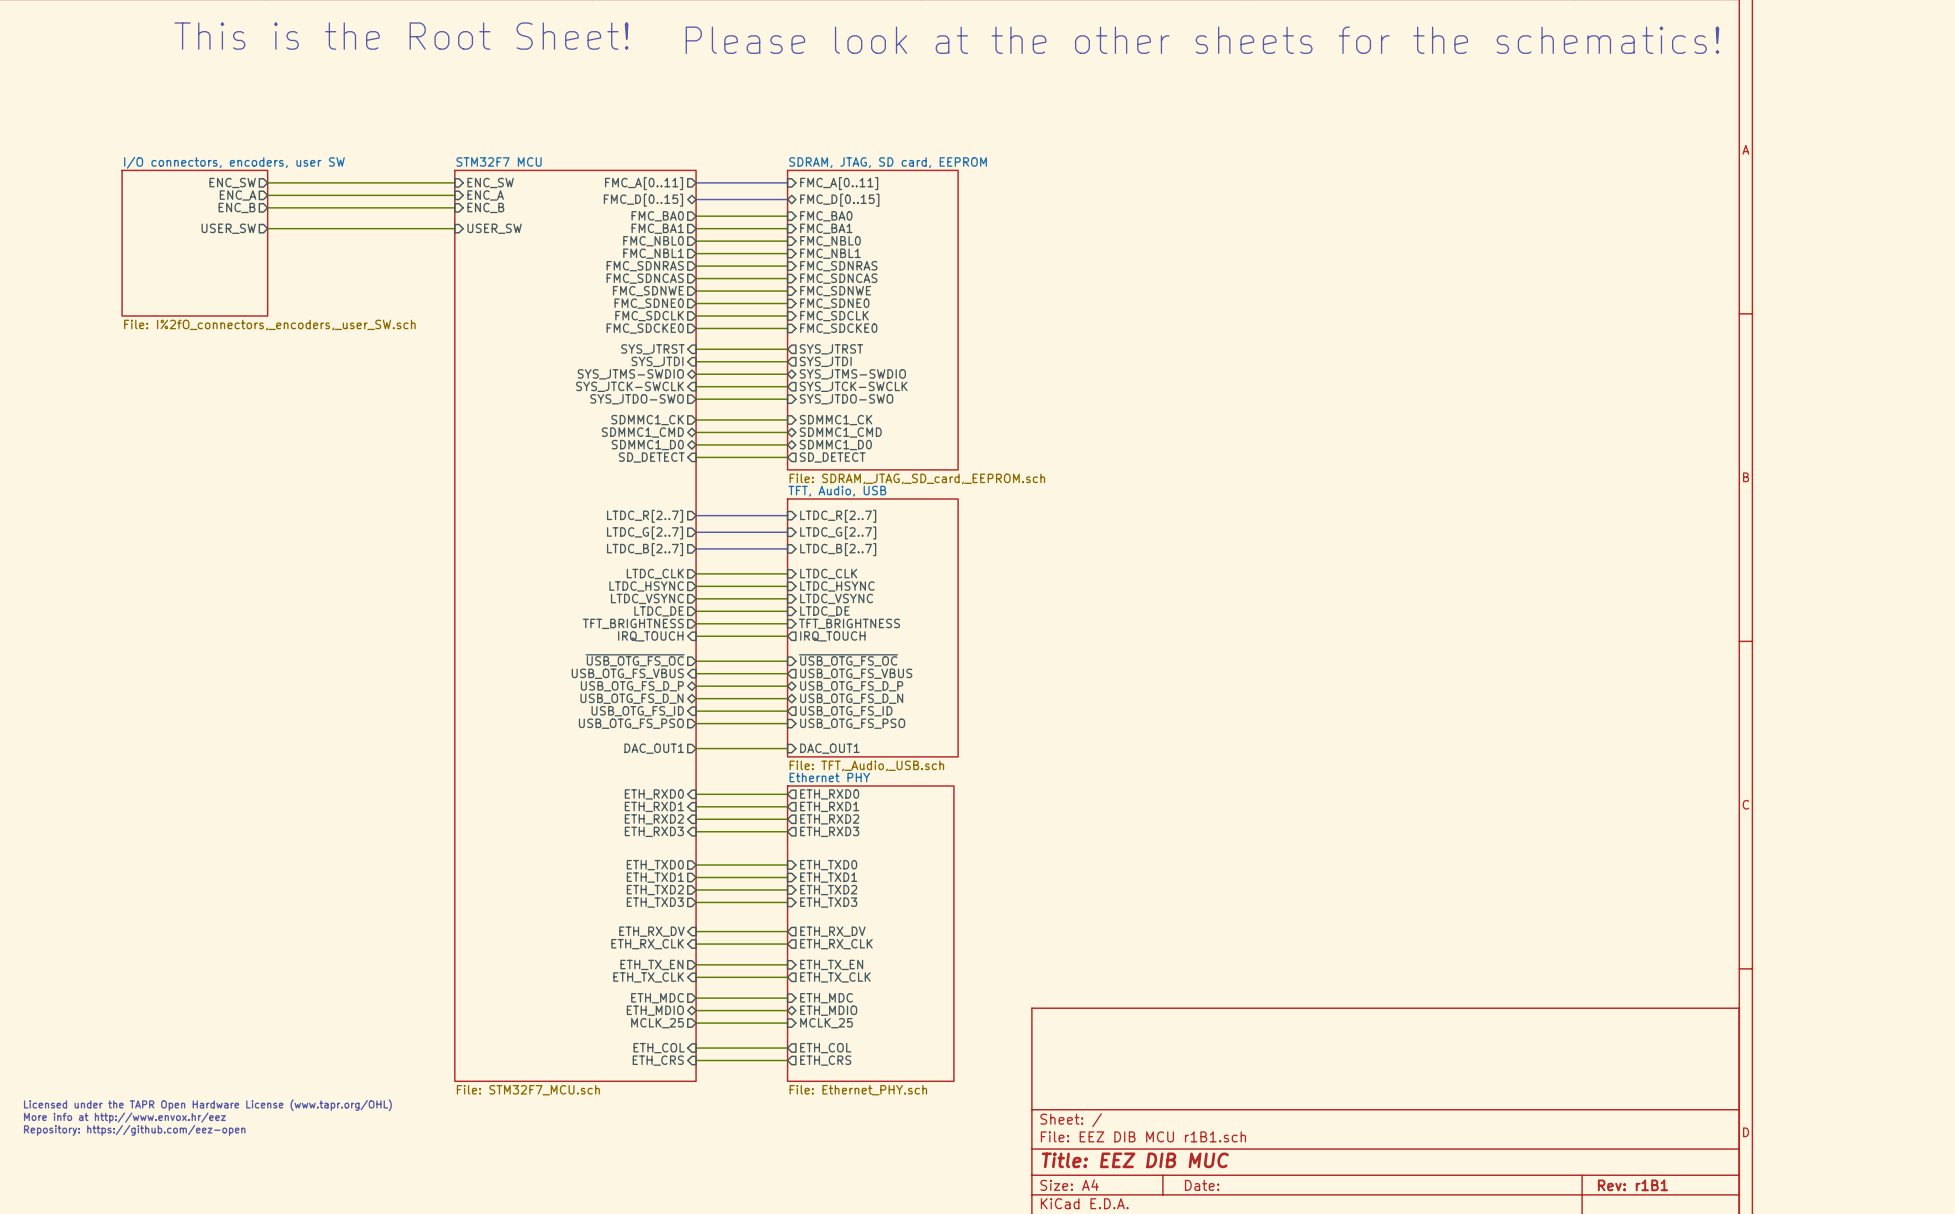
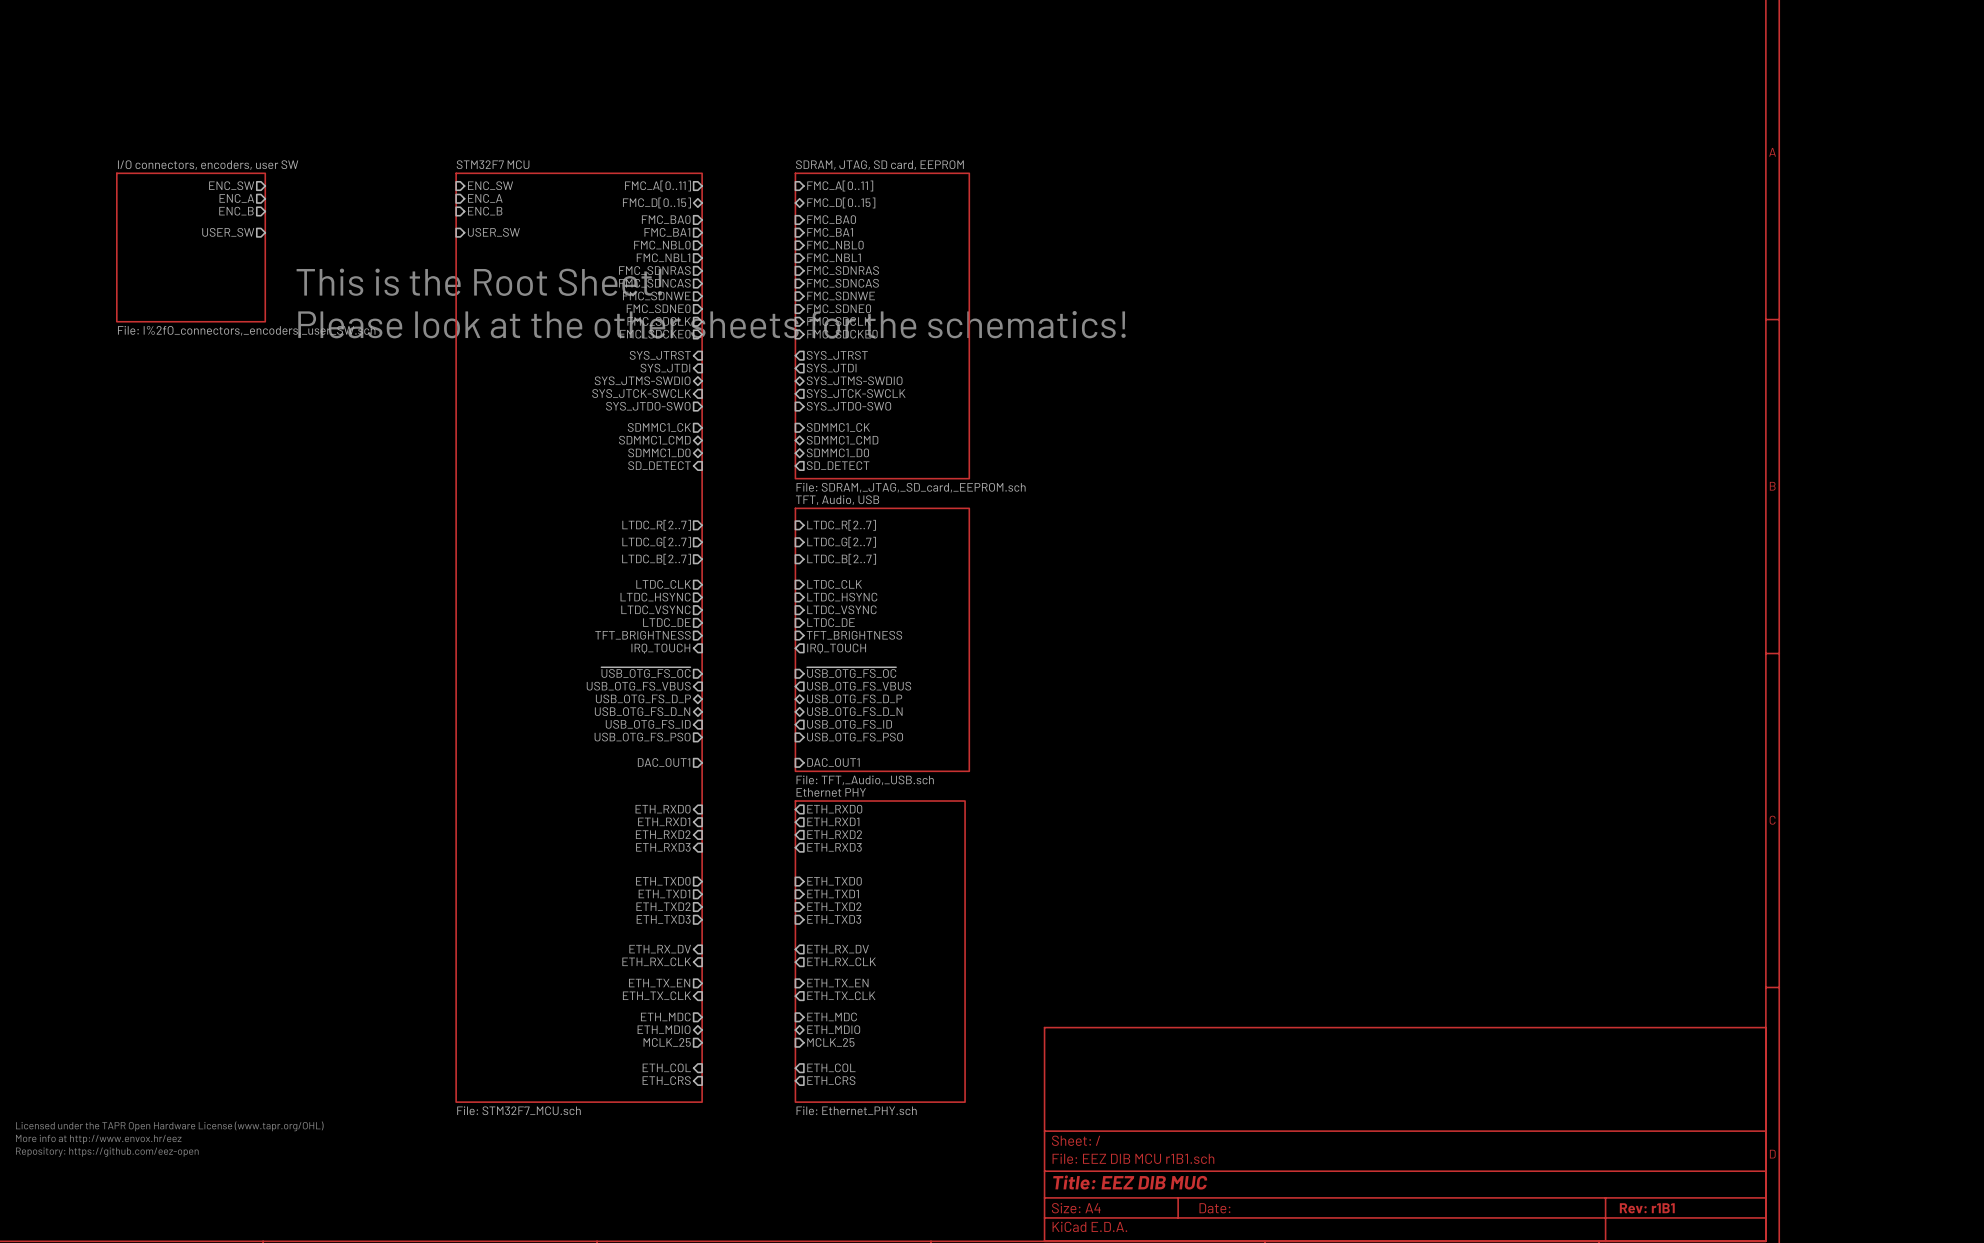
text: This is the Root Sheet! (401, 36) -> none
text: Please look at the other sheets for the schematics! (1202, 40) -> none
wire: (267, 182) (454, 182) -> none
bus: (696, 182) (787, 182) -> none
wire: (267, 195) (454, 195) -> none
bus: (696, 199) (787, 199) -> none
wire: (267, 207) (454, 207) -> none
wire: (696, 216) (787, 216) -> none
wire: (267, 228) (454, 228) -> none
wire: (696, 228) (787, 228) -> none
wire: (696, 241) (787, 241) -> none
wire: (696, 253) (787, 253) -> none
wire: (696, 266) (787, 266) -> none
text: none -> This is the Root Sheet! (479, 282)
wire: (696, 278) (787, 278) -> none
wire: (696, 291) (787, 291) -> none
wire: (696, 303) (787, 303) -> none
wire: (696, 315) (787, 315) -> none
text: none -> Please look at the other sheets for the schematics! (711, 324)
wire: (696, 328) (787, 328) -> none
wire: (696, 349) (787, 349) -> none
wire: (696, 361) (787, 361) -> none
wire: (696, 374) (787, 374) -> none
wire: (696, 386) (787, 386) -> none
wire: (696, 399) (787, 399) -> none
wire: (696, 419) (787, 419) -> none
wire: (696, 432) (787, 432) -> none
wire: (696, 444) (787, 444) -> none
wire: (696, 457) (787, 457) -> none
bus: (696, 515) (787, 515) -> none
bus: (696, 532) (787, 532) -> none
bus: (696, 548) (787, 548) -> none
wire: (696, 573) (787, 573) -> none
wire: (696, 586) (787, 586) -> none
wire: (696, 598) (787, 598) -> none
wire: (696, 611) (787, 611) -> none
wire: (696, 623) (787, 623) -> none
wire: (696, 636) (787, 636) -> none
wire: (696, 661) (787, 661) -> none
wire: (696, 673) (787, 673) -> none
wire: (696, 686) (787, 686) -> none
wire: (696, 698) (787, 698) -> none
wire: (696, 711) (787, 711) -> none
wire: (696, 723) (787, 723) -> none
wire: (696, 748) (787, 748) -> none
wire: (696, 794) (787, 794) -> none
wire: (696, 806) (787, 806) -> none
wire: (696, 819) (787, 819) -> none
wire: (696, 831) (787, 831) -> none
wire: (696, 865) (787, 865) -> none
wire: (696, 877) (787, 877) -> none
wire: (696, 889) (787, 889) -> none
wire: (696, 902) (787, 902) -> none
wire: (696, 931) (787, 931) -> none
wire: (696, 944) (787, 944) -> none
wire: (696, 964) (787, 964) -> none
wire: (696, 977) (787, 977) -> none
wire: (696, 998) (787, 998) -> none
wire: (696, 1010) (787, 1010) -> none
wire: (696, 1023) (787, 1023) -> none
wire: (696, 1048) (787, 1048) -> none
wire: (696, 1060) (787, 1060) -> none

